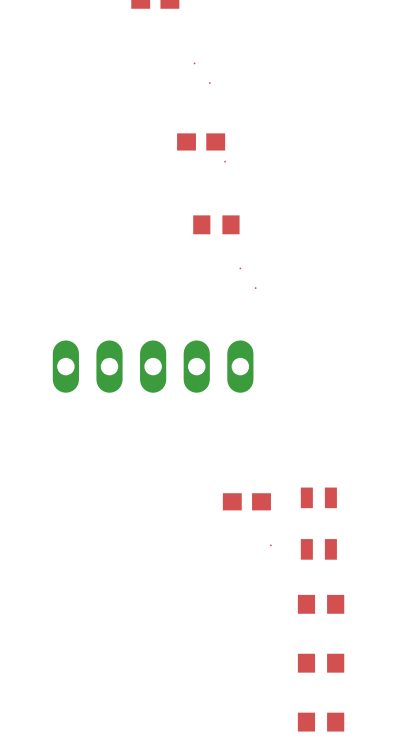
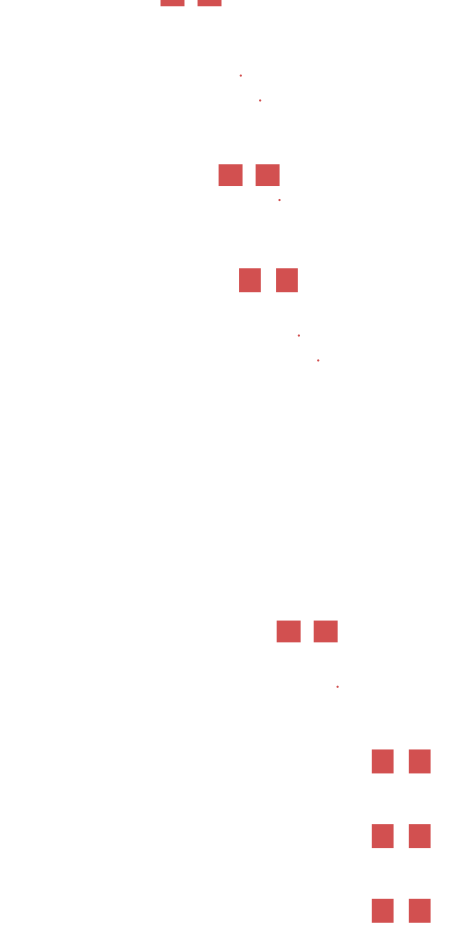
part: (153, 366) -> none
part: (318, 523) -> none

